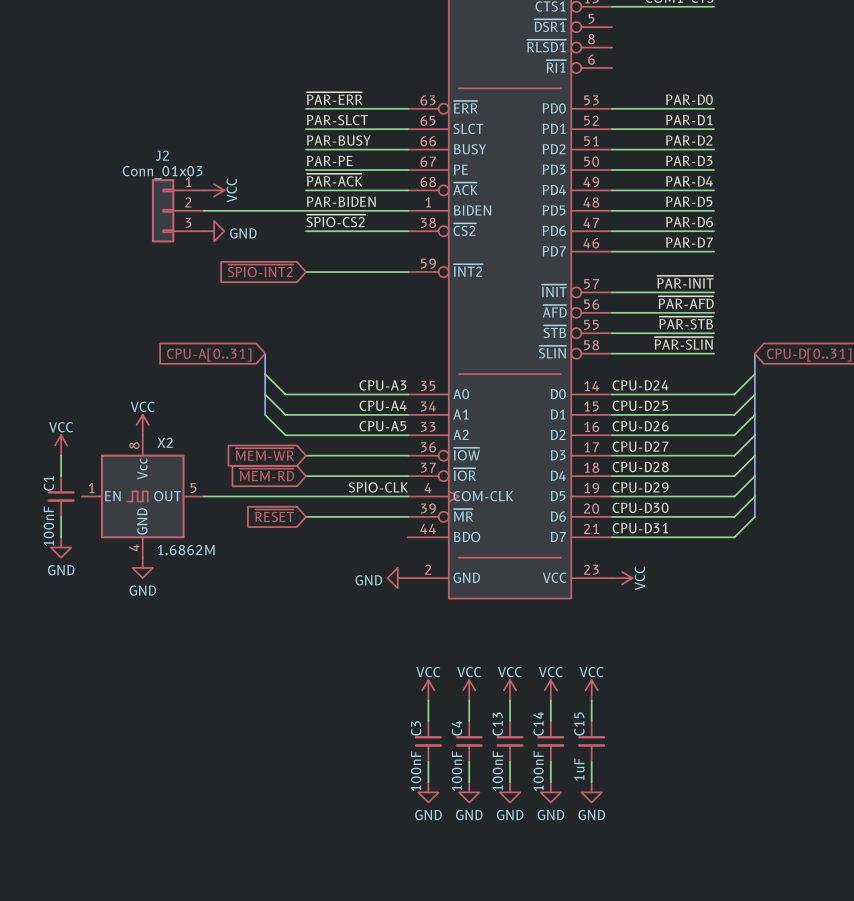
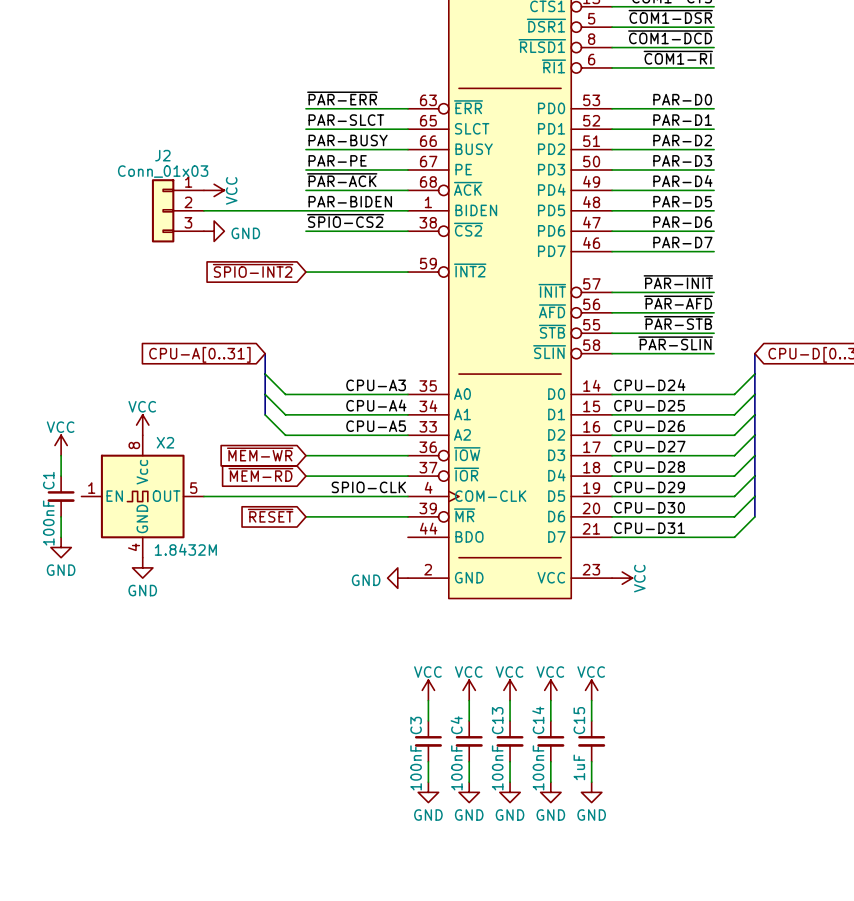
label: none -> ~{COM1-DSR} (670, 16)
wire: none -> (612, 27) (714, 27)
label: none -> ~{COM1-DCD} (670, 37)
wire: none -> (612, 47) (714, 47)
label: none -> ~{COM1-RI} (678, 57)
wire: none -> (612, 67) (714, 67)
X2 value: 1.6862M (186, 550) -> 1.8432M (185, 549)

